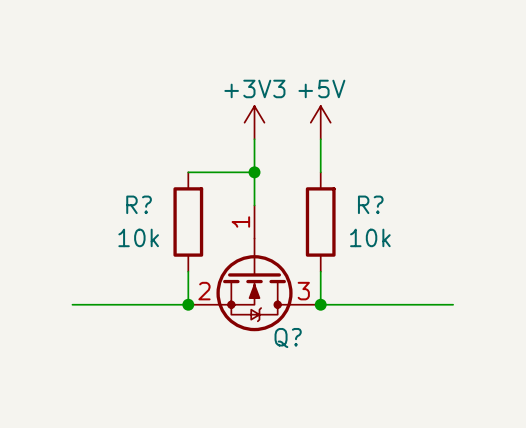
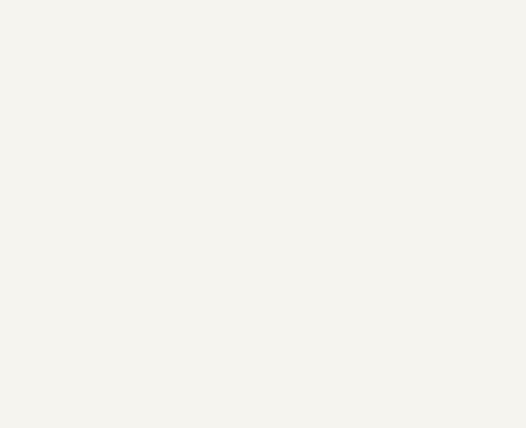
power symbol: +3V3 (254, 122) -> none
power symbol: +5V (320, 122) -> none
wire: (254, 139) (254, 205) -> none
wire: (320, 139) (320, 172) -> none
wire: (188, 172) (254, 172) -> none
junction: (254, 172) -> none
R?: 10k (188, 221) -> none
R?: 10k (320, 221) -> none
Q?: (254, 268) -> none
wire: (188, 271) (188, 304) (72, 304) -> none
wire: (320, 271) (320, 304) (453, 304) -> none
junction: (188, 304) -> none
junction: (320, 304) -> none

